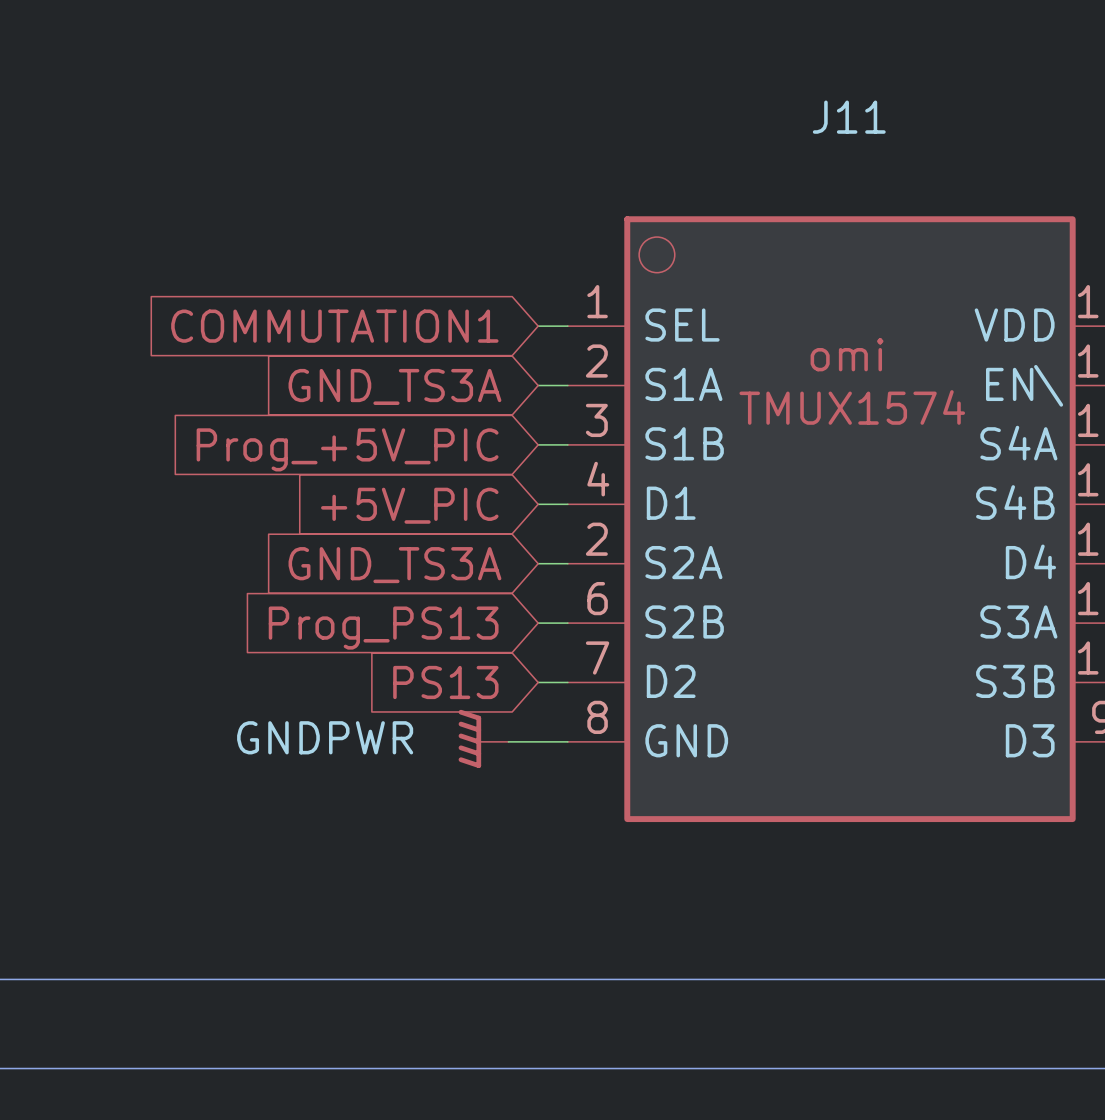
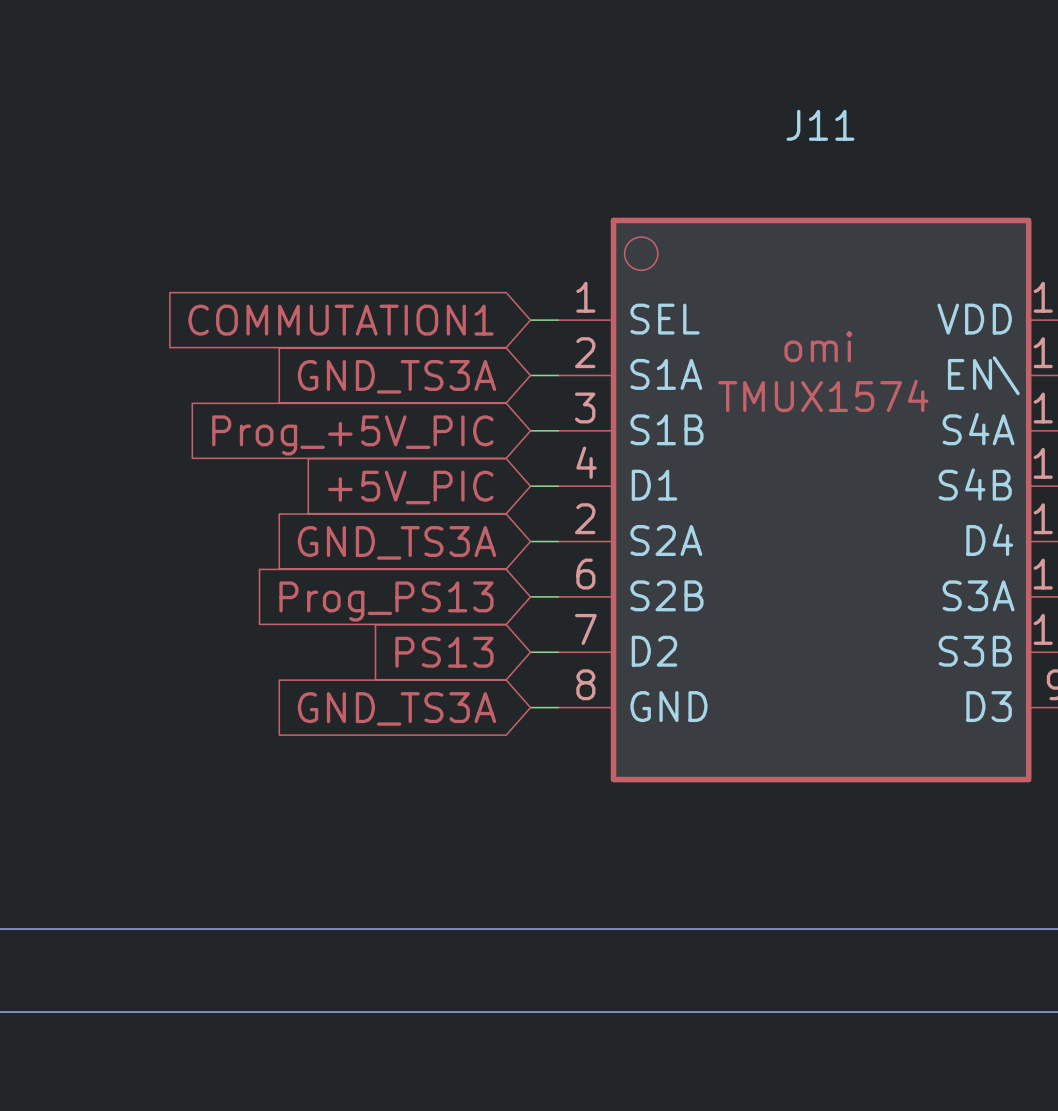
power symbol: GNDPWR (483, 738) -> none
wire: (508, 741) (538, 741) -> none
global label: none -> GND_TS3A (397, 708)

